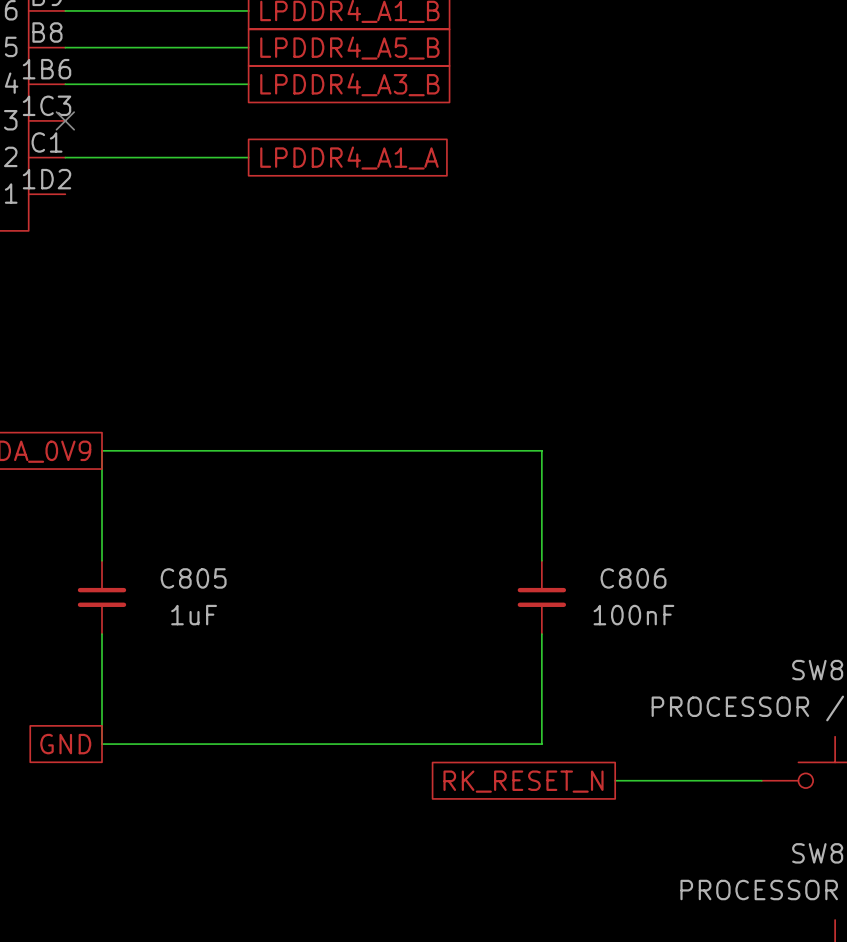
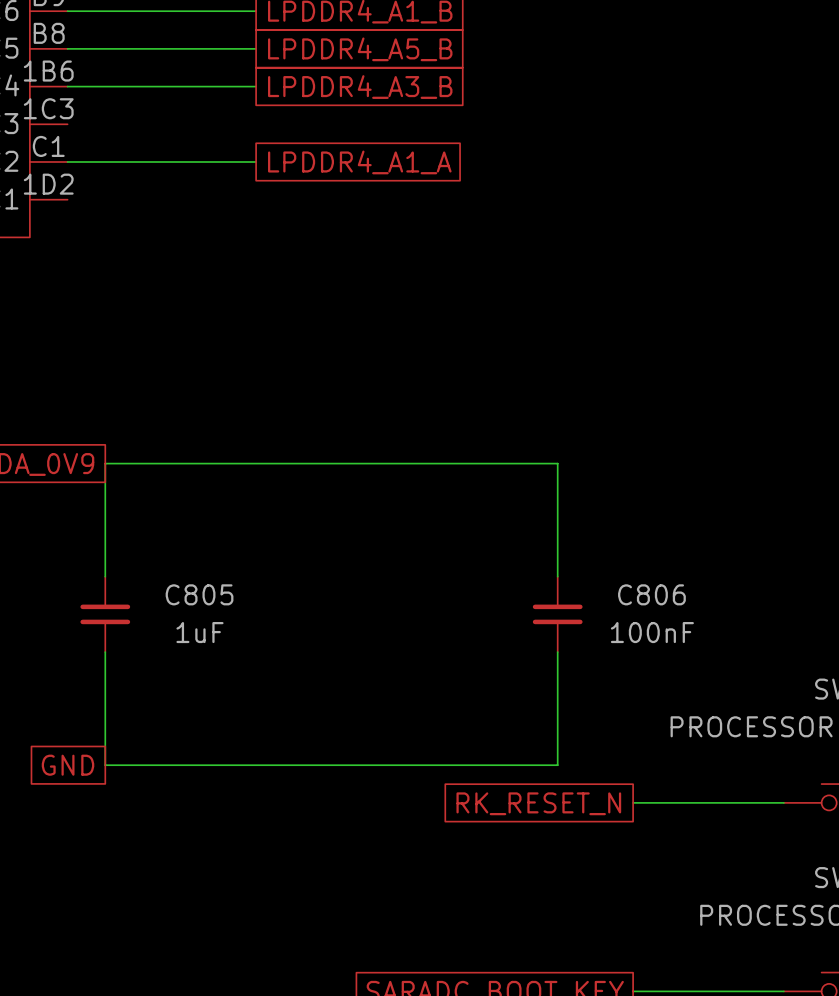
no-connect mark: (65, 120) -> none

